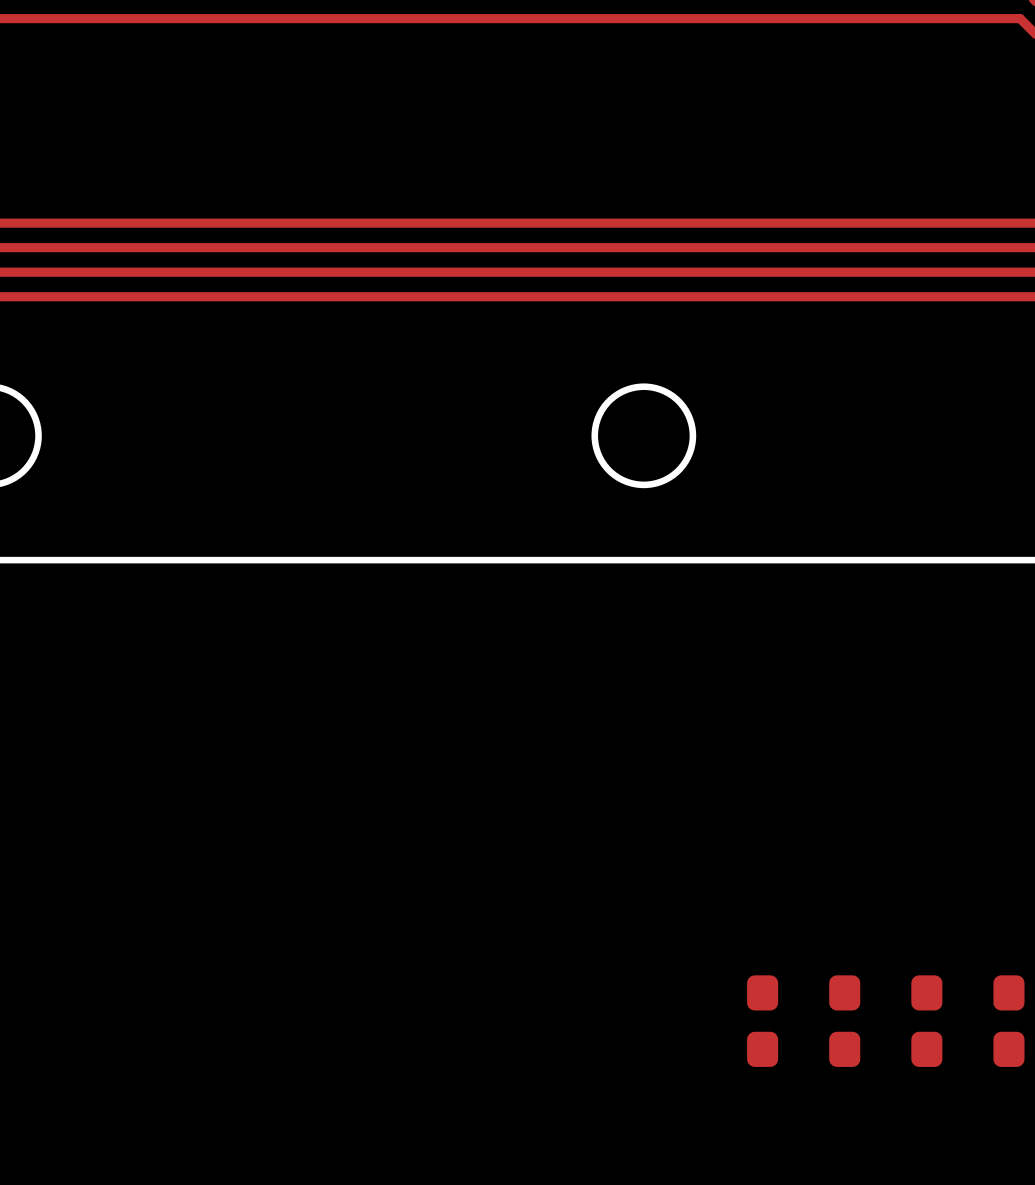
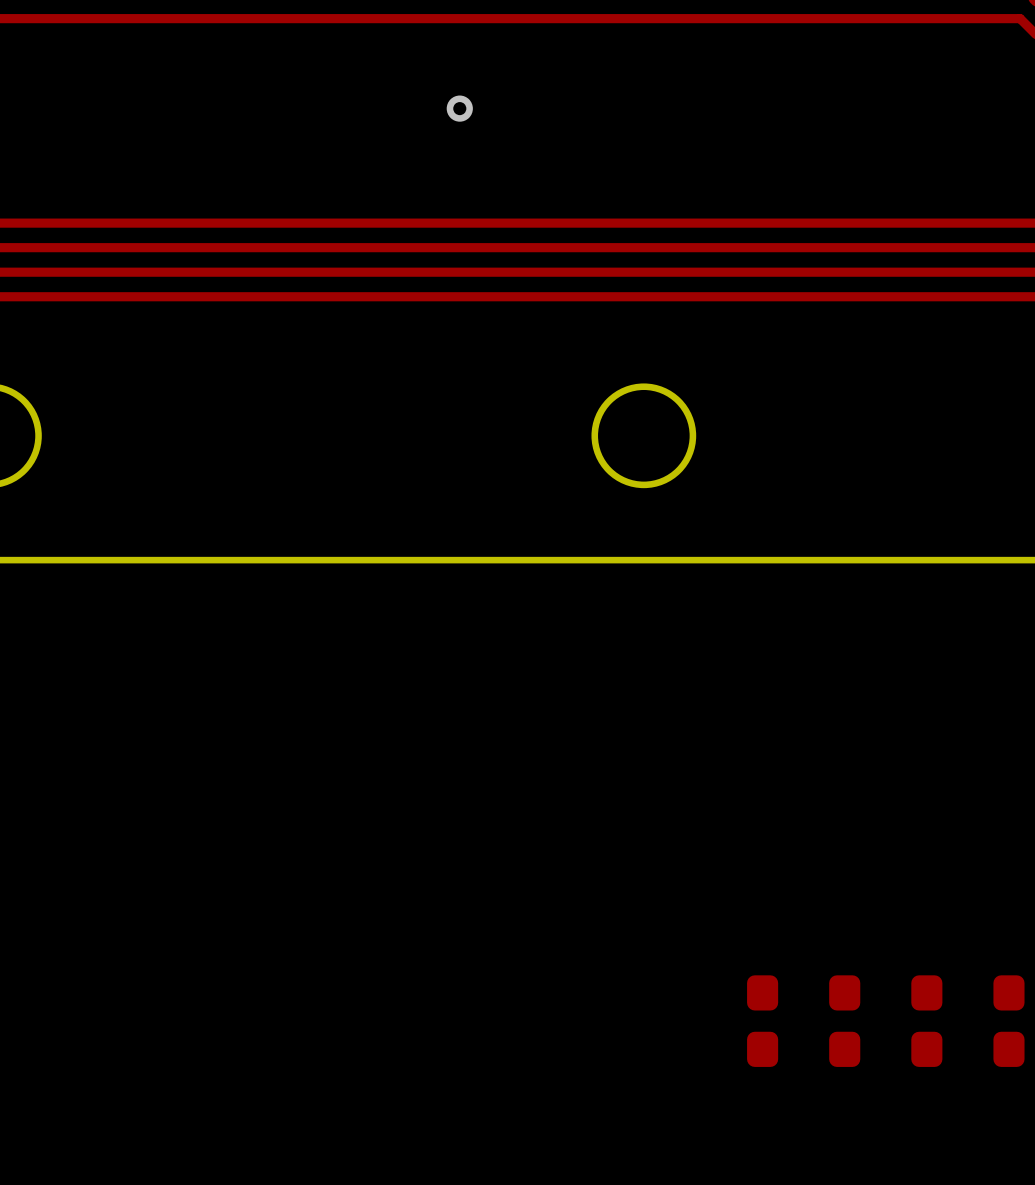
via: none -> (459, 108)

